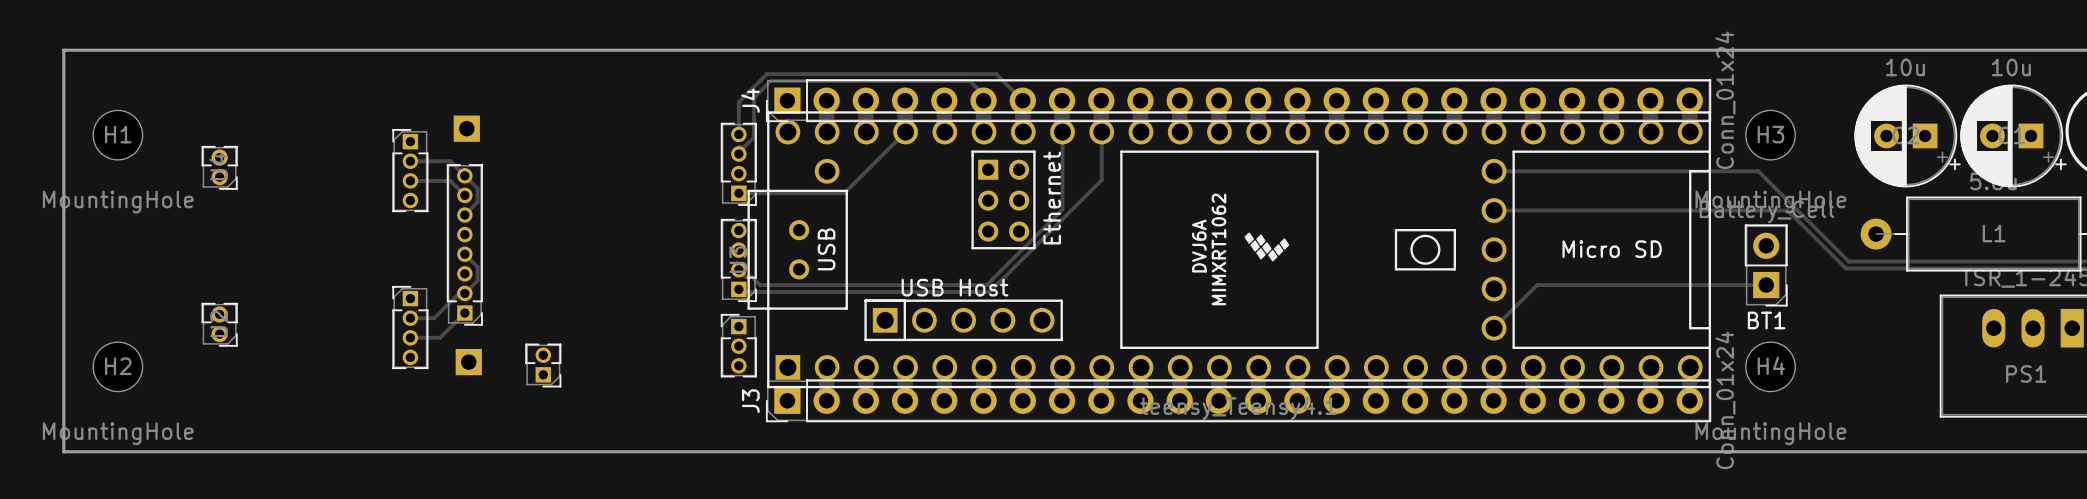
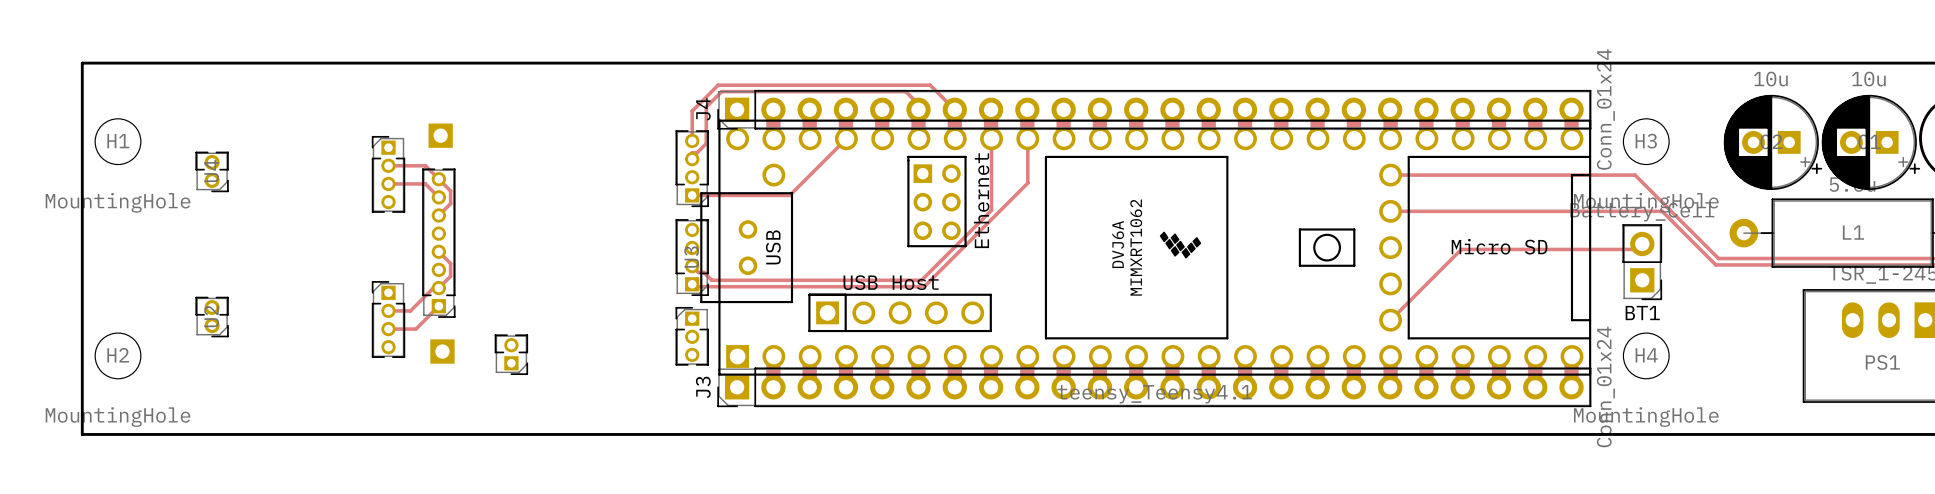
board edge: (79, 50) (63, 50) (63, 451) (79, 451) -> (82, 63) (82, 434)
track: (1537, 285) (1766, 285) -> (1430, 280) (1461, 249) (1640, 249)

